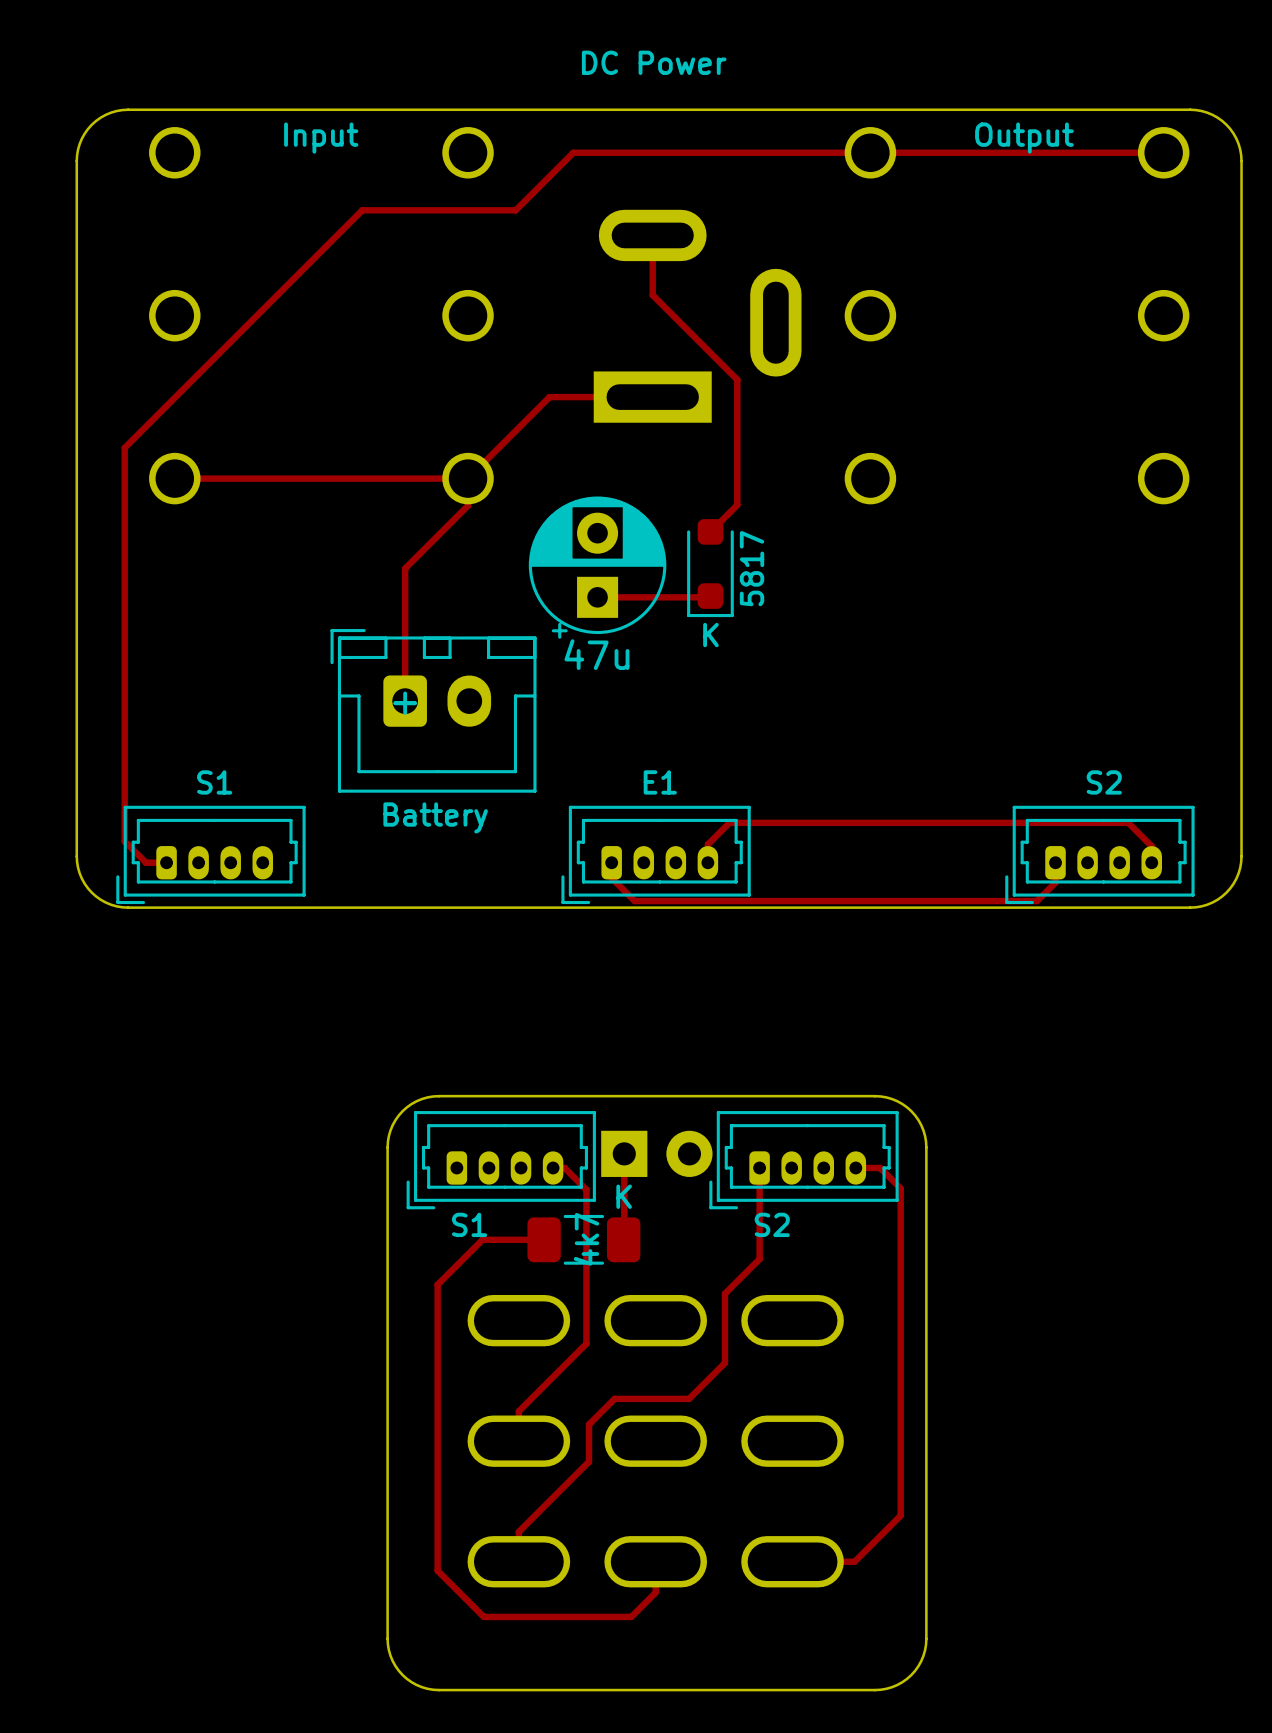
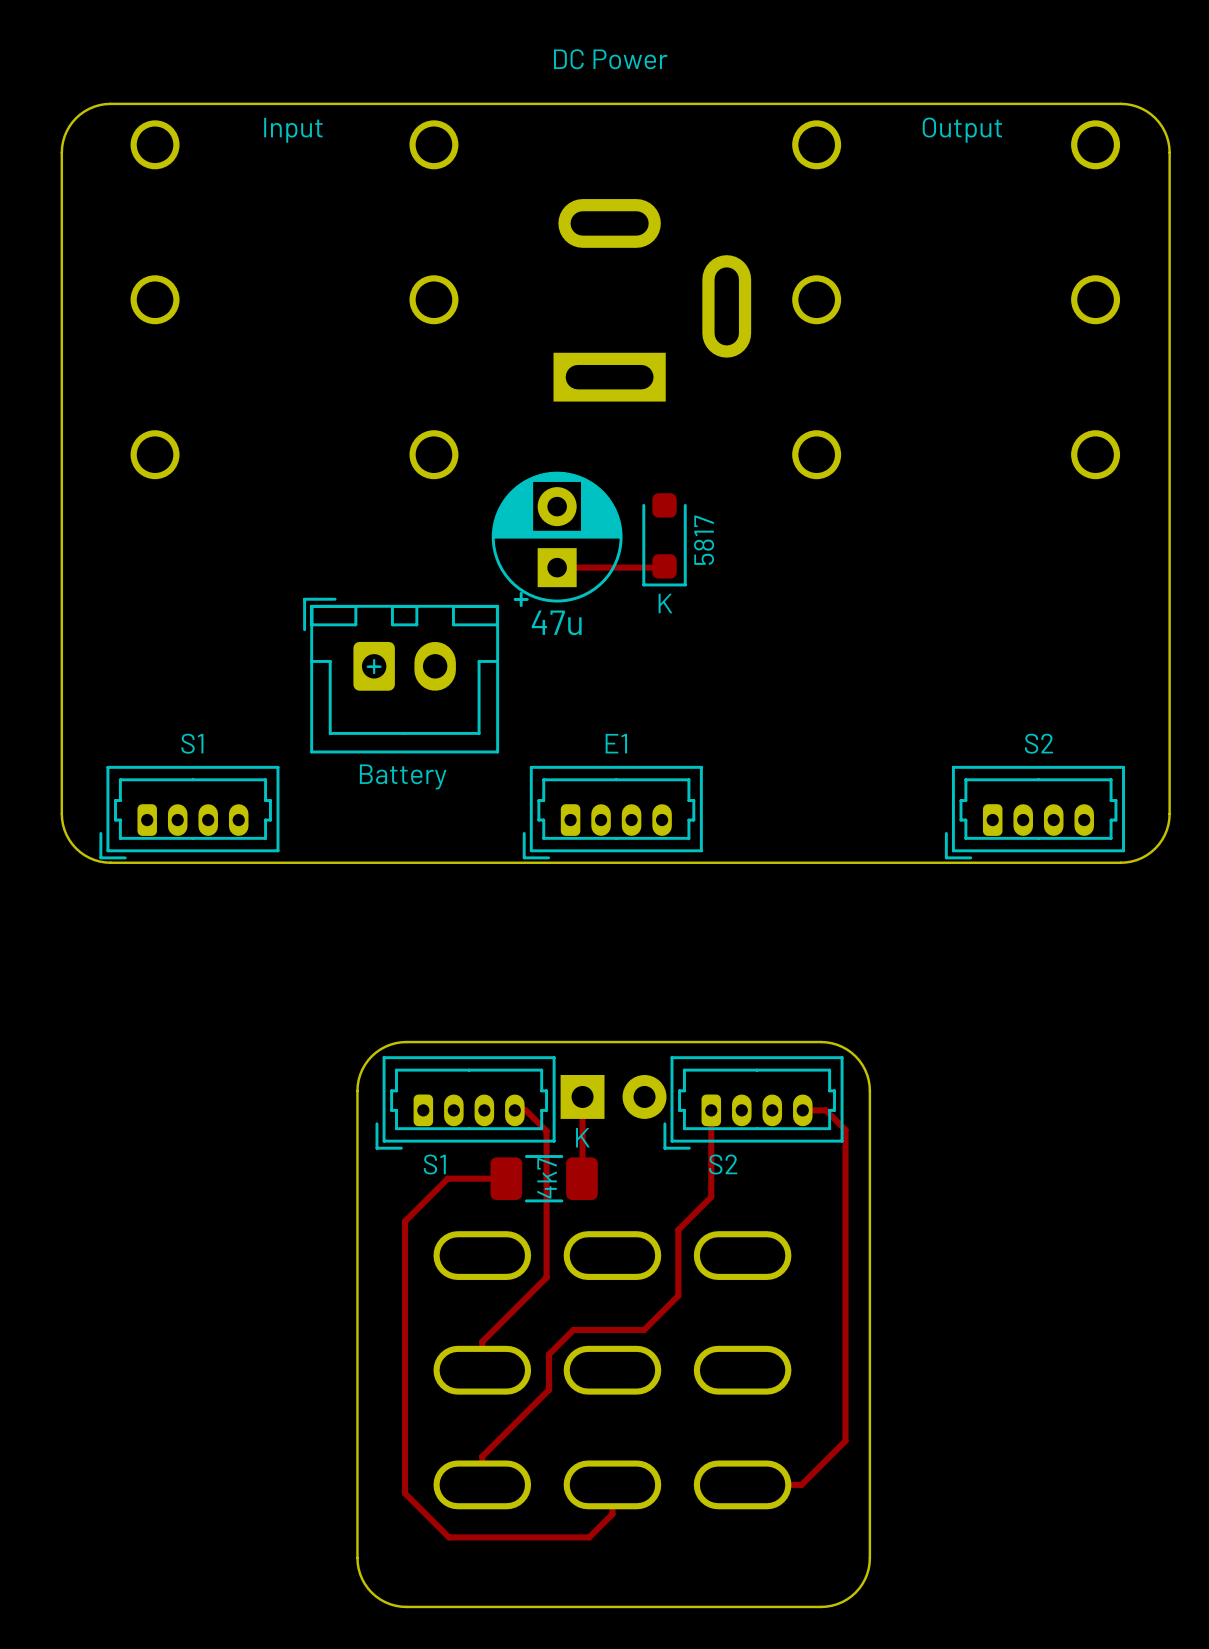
track: (1163, 152) (573, 152) (515, 210) (362, 210) (124, 447) (124, 841) (146, 862) (166, 862) -> none
track: (652, 235) (652, 295) (737, 379) (737, 505) (710, 531) -> none
track: (652, 397) (549, 397) (468, 478) -> none
track: (174, 478) (468, 478) -> none
track: (468, 478) (468, 505) (405, 568) (405, 701) -> none
track: (611, 862) (611, 878) (634, 901) (1037, 901) (1055, 882) (1055, 862) -> none
track: (707, 862) (707, 844) (729, 822) (1128, 822) (1151, 846) (1151, 862) -> none

